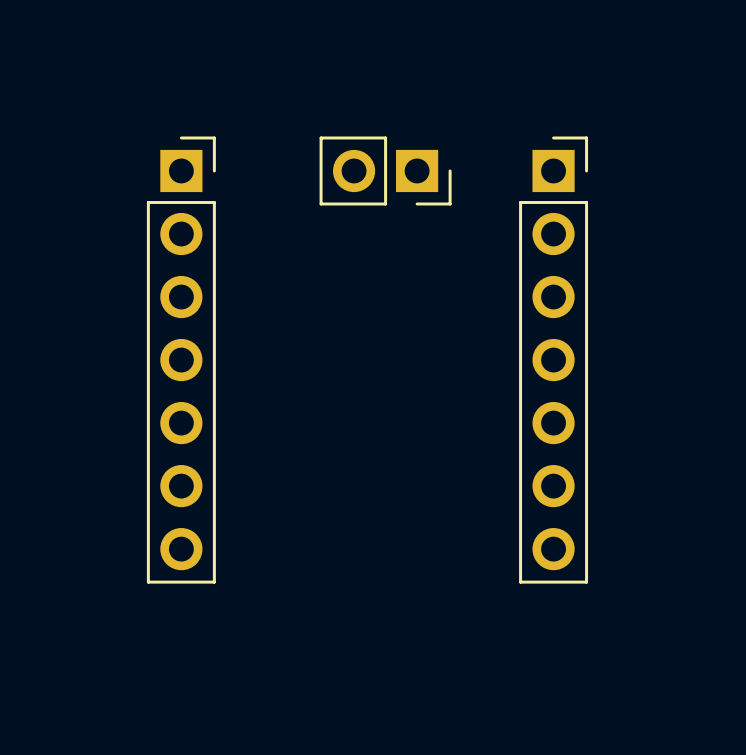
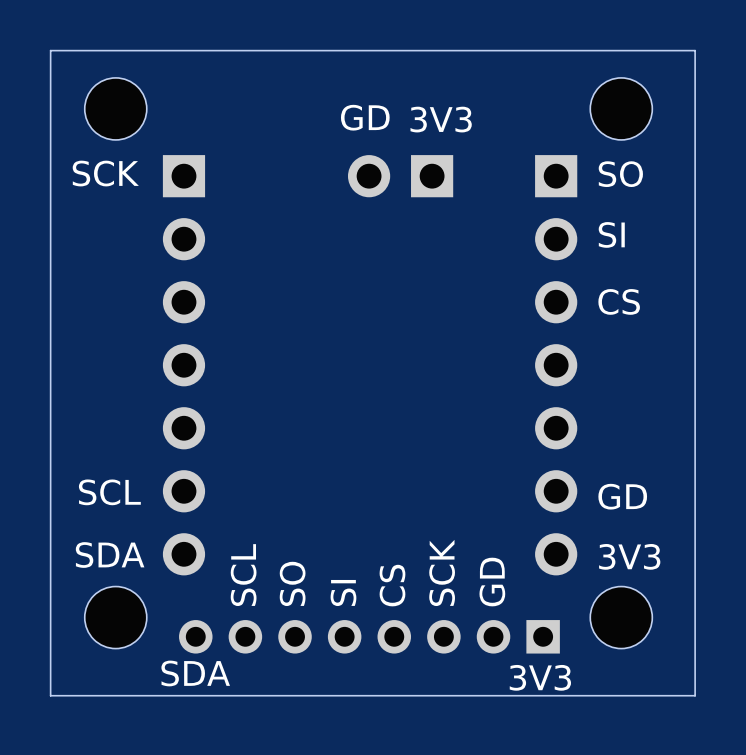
board edge: none -> (50, 50) (695, 50) (695, 695) (50, 695) (50, 50)
part: none -> (115, 108)
part: none -> (621, 108)
text: none -> GD (365, 117)
text: none -> 3V3 (441, 119)
part footprint: [146, 136, 216, 584] -> [162, 155, 206, 576]
part footprint: [319, 136, 452, 206] -> [347, 155, 454, 198]
part footprint: [519, 136, 589, 584] -> [535, 155, 578, 576]
text: none -> SCK (105, 173)
text: none -> SO (620, 174)
text: none -> SI (611, 234)
text: none -> CS (619, 301)
text: none -> SCL (109, 492)
text: none -> GD (622, 496)
text: none -> SDA (110, 555)
text: none -> 3V3 (629, 556)
text: none -> SCK (442, 572)
text: none -> SCL (243, 575)
text: none -> CS (392, 585)
text: none -> GD (492, 582)
text: none -> SO (292, 583)
text: none -> SI (343, 592)
part: none -> (115, 617)
part: none -> (621, 617)
part: none -> (369, 636)
text: none -> SDA (195, 673)
text: none -> 3V3 (540, 677)

